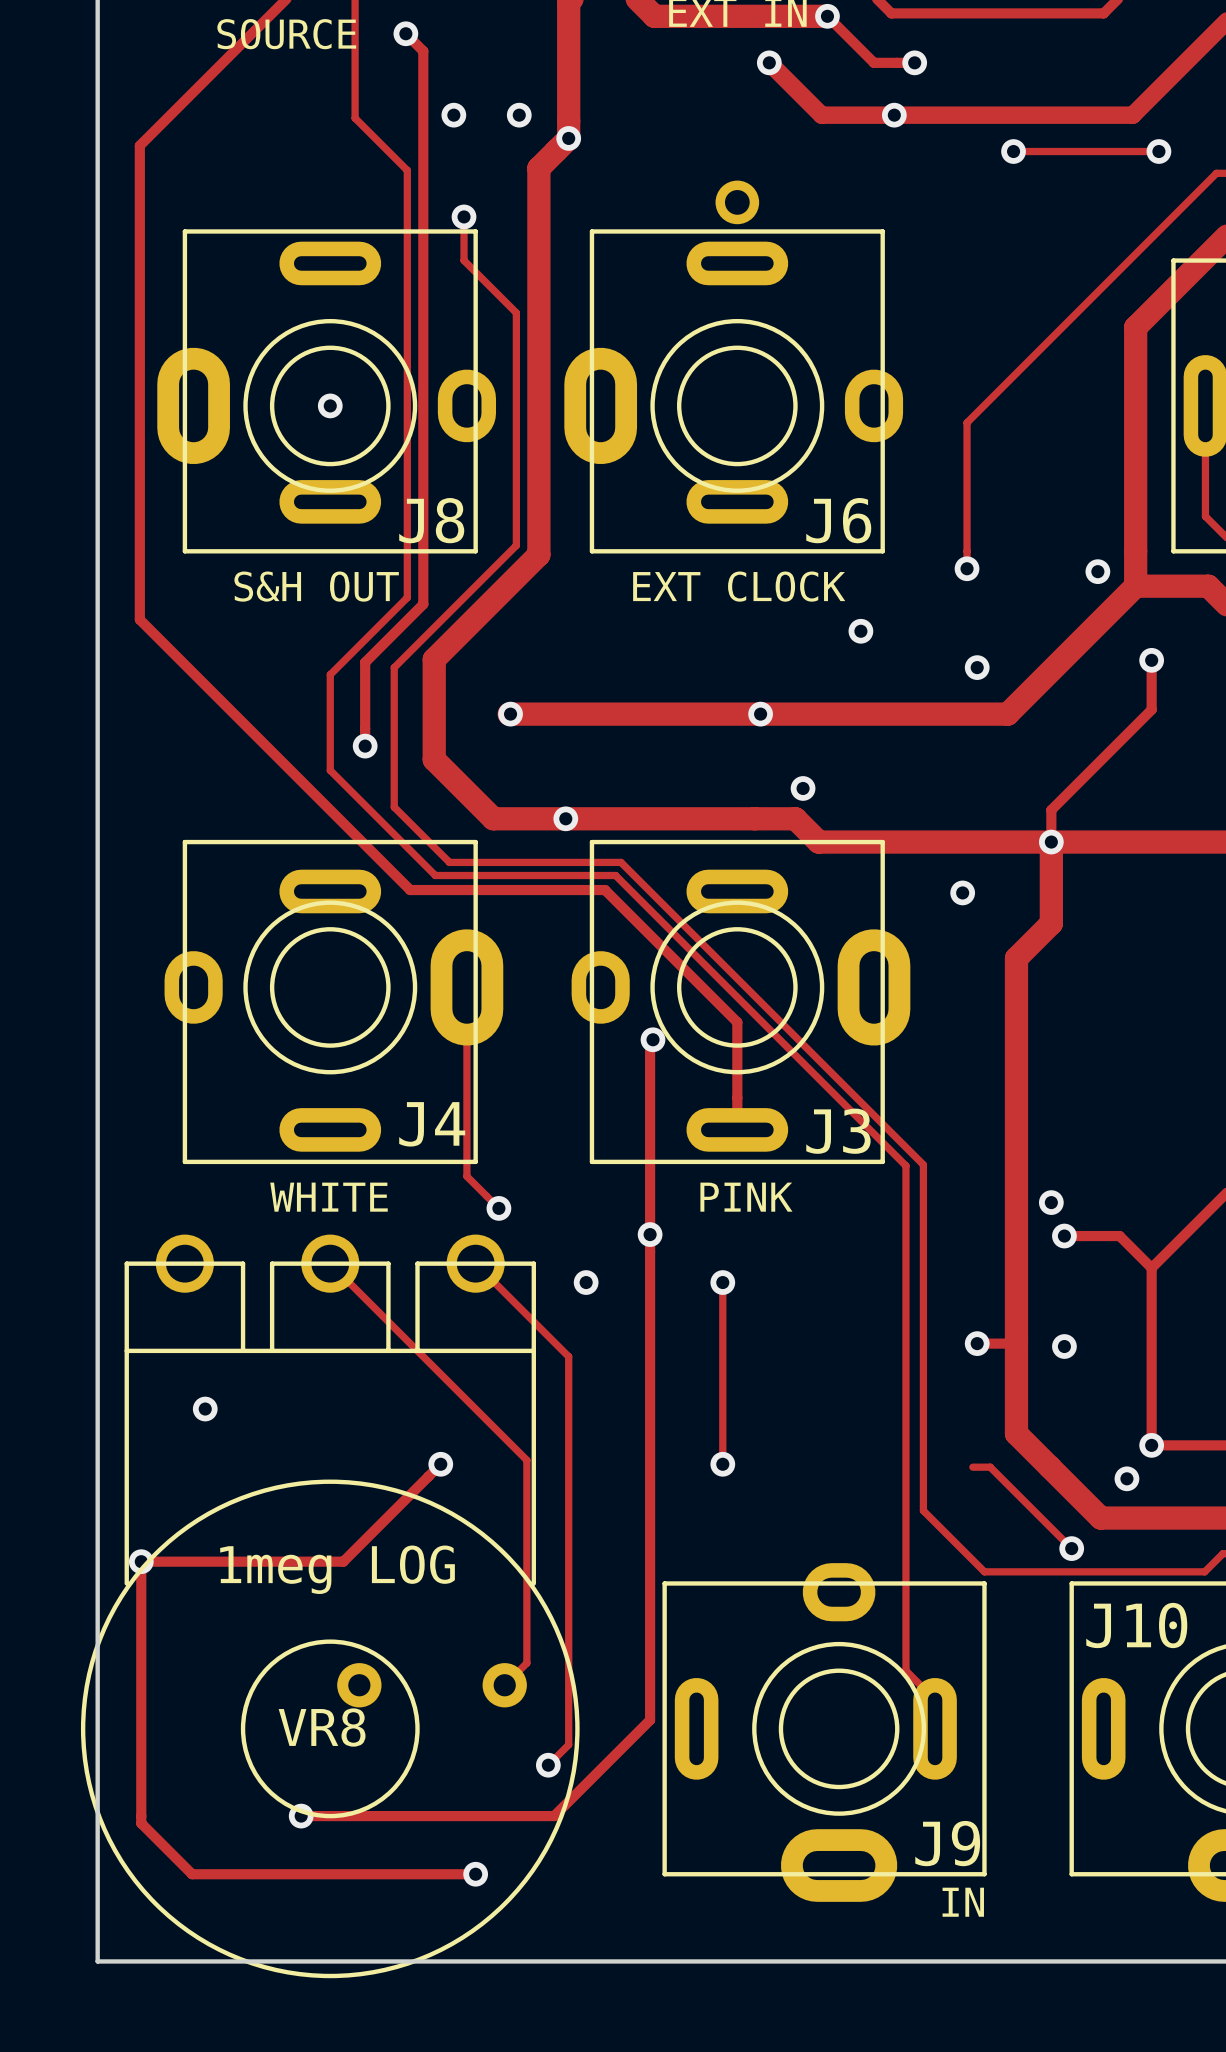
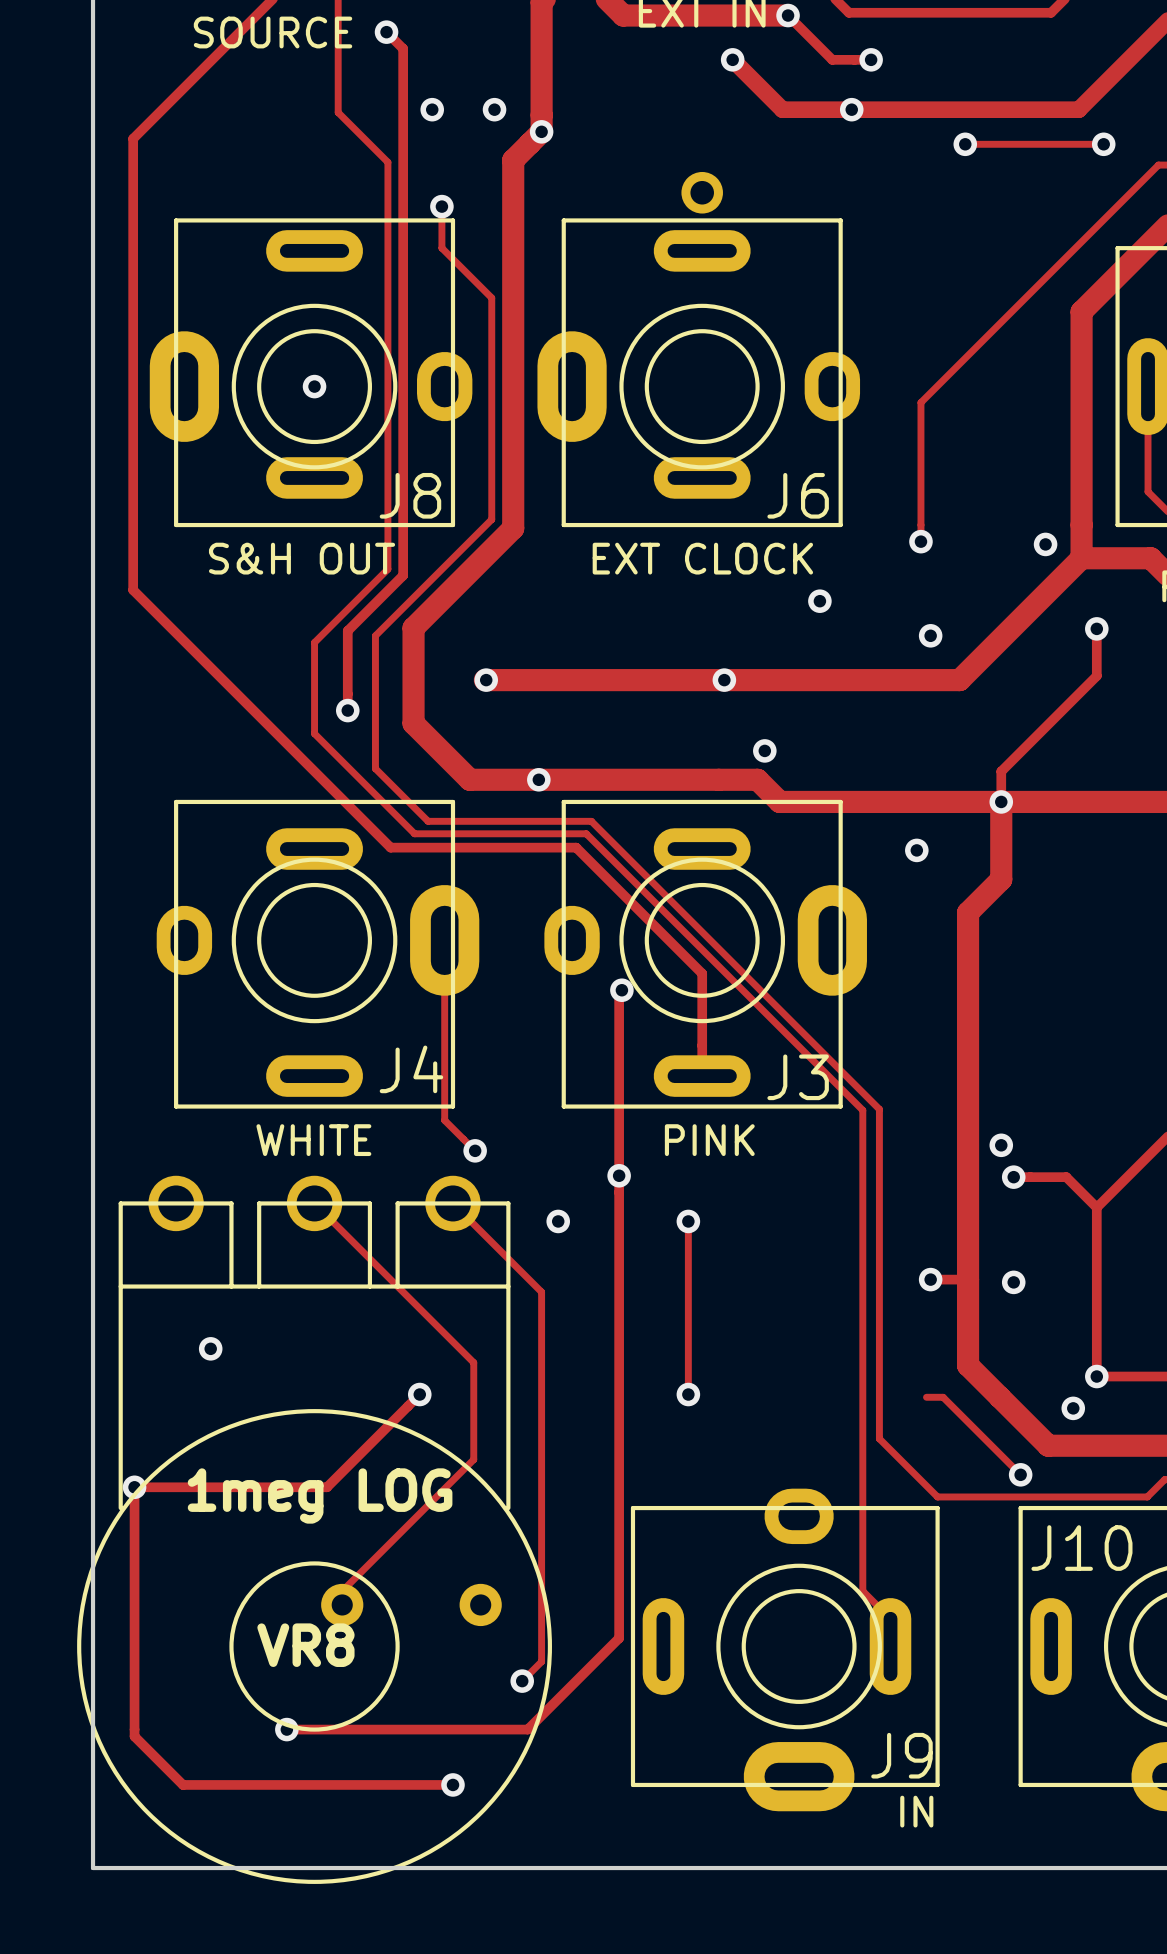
via position: (205, 1409) -> (210, 1348)
track: (497, 1430) (526, 1460) (526, 1663) (504, 1685) -> (473, 1362) (473, 1459) (335, 1598)

